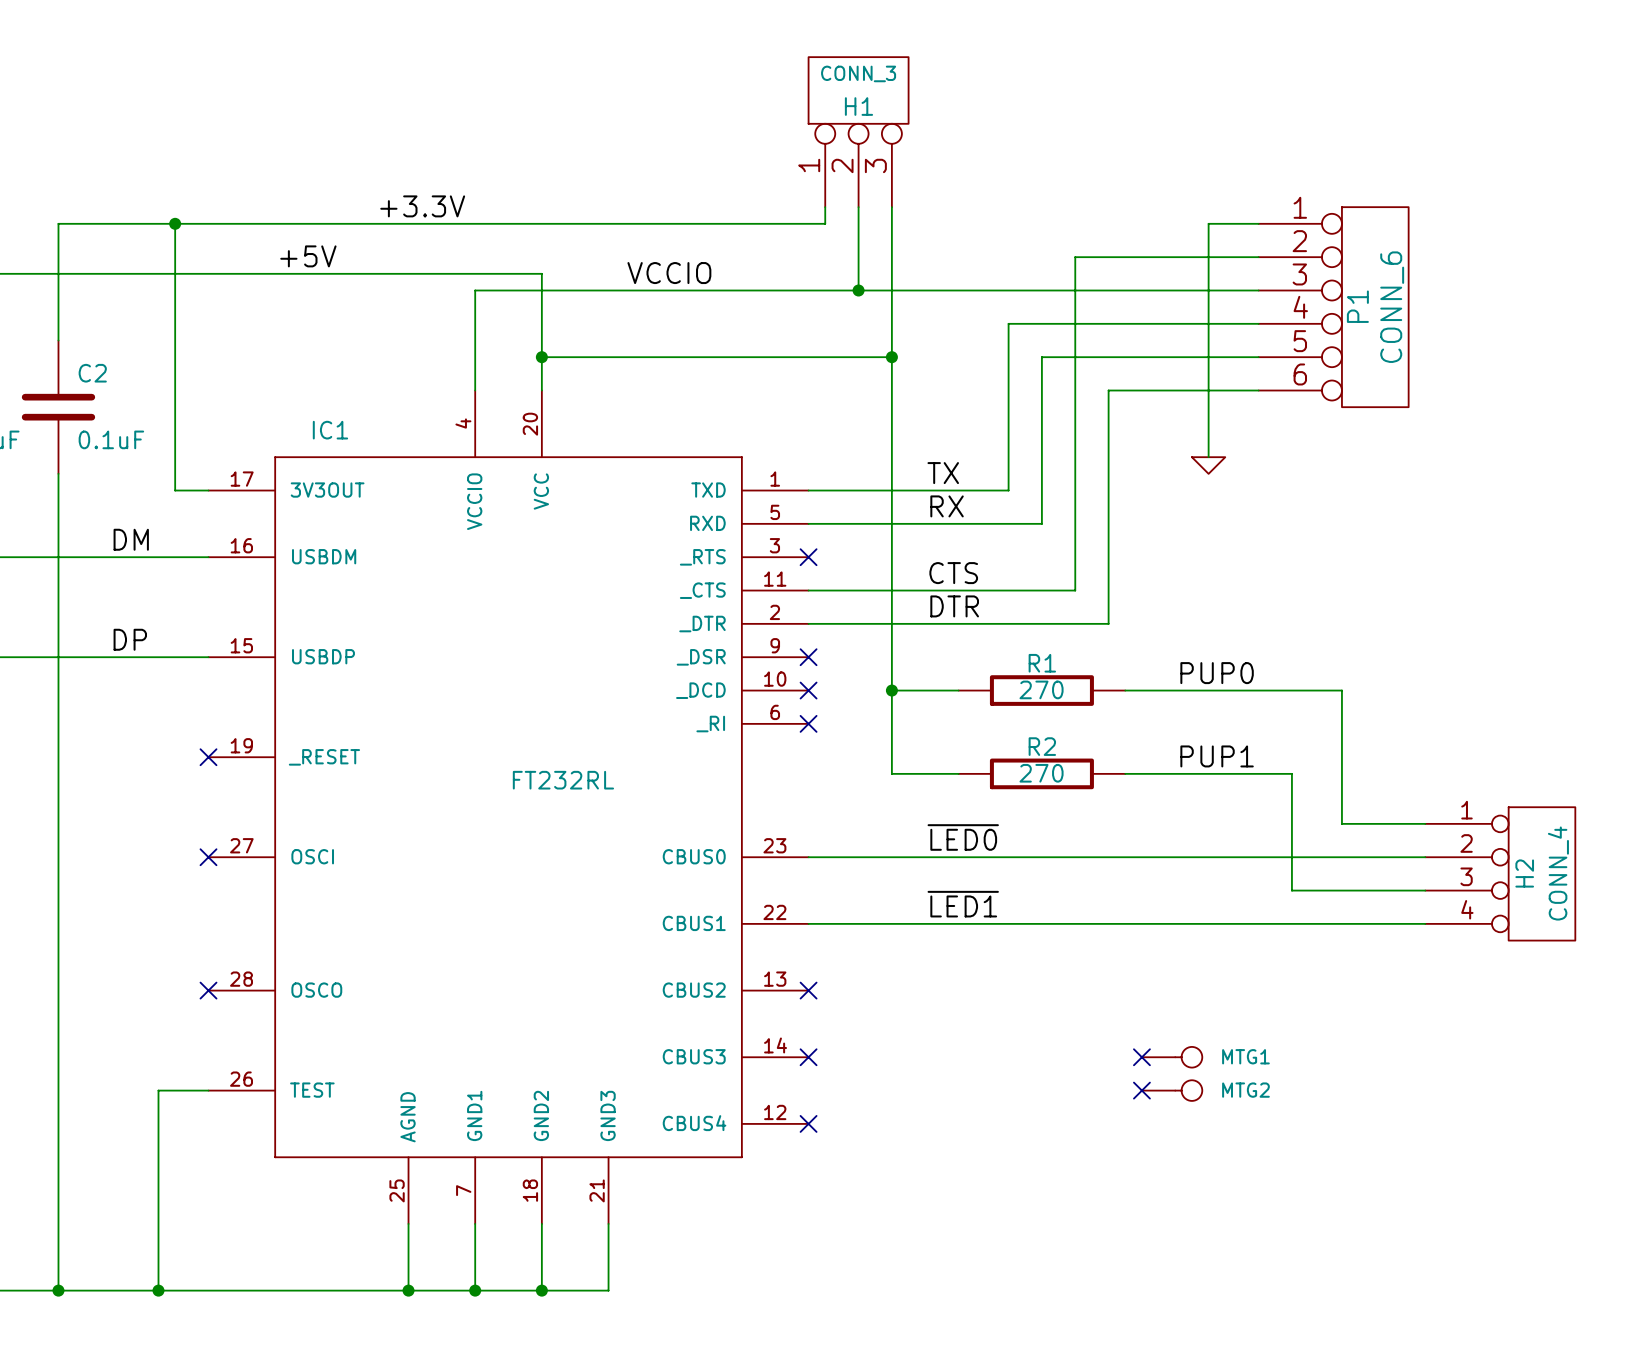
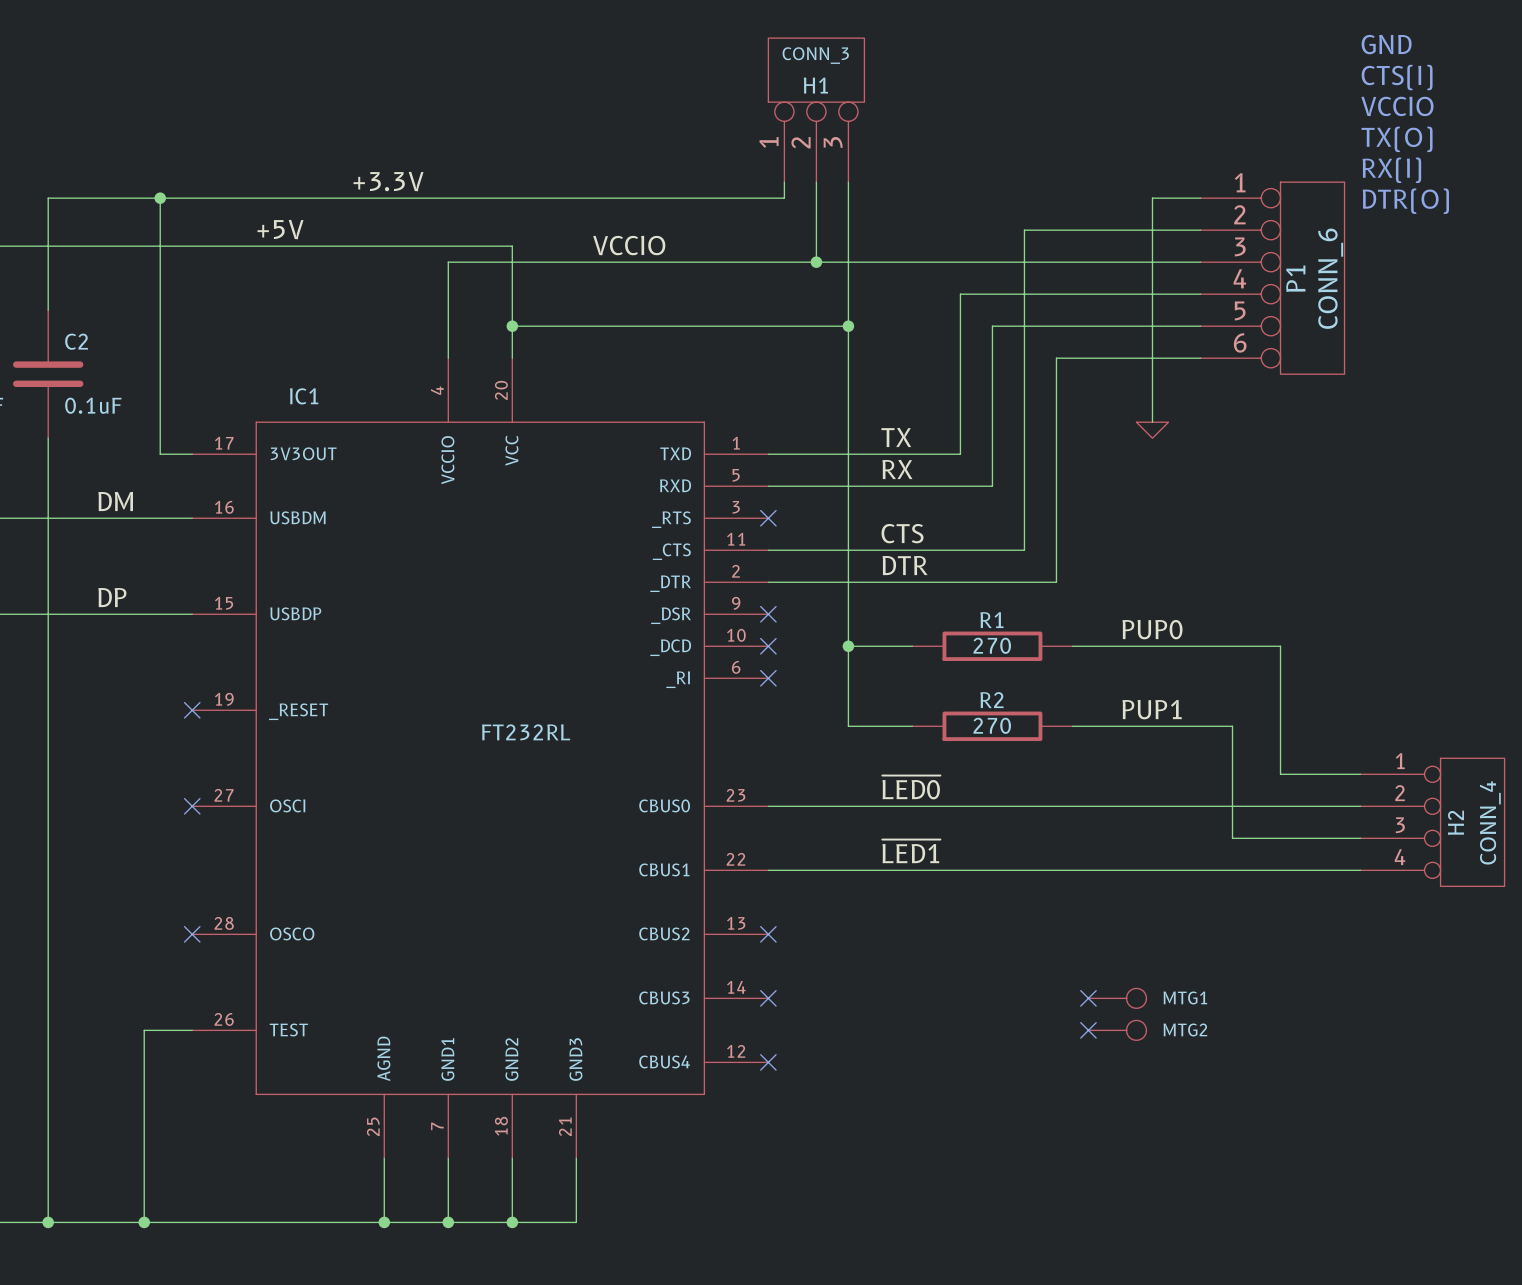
text: none -> GND (1386, 44)
text: none -> CTS(I) (1397, 77)
text: none -> VCCIO (1397, 106)
text: none -> TX(O) (1397, 139)
text: none -> RX(I) (1391, 170)
text: none -> DTR(O) (1405, 201)

